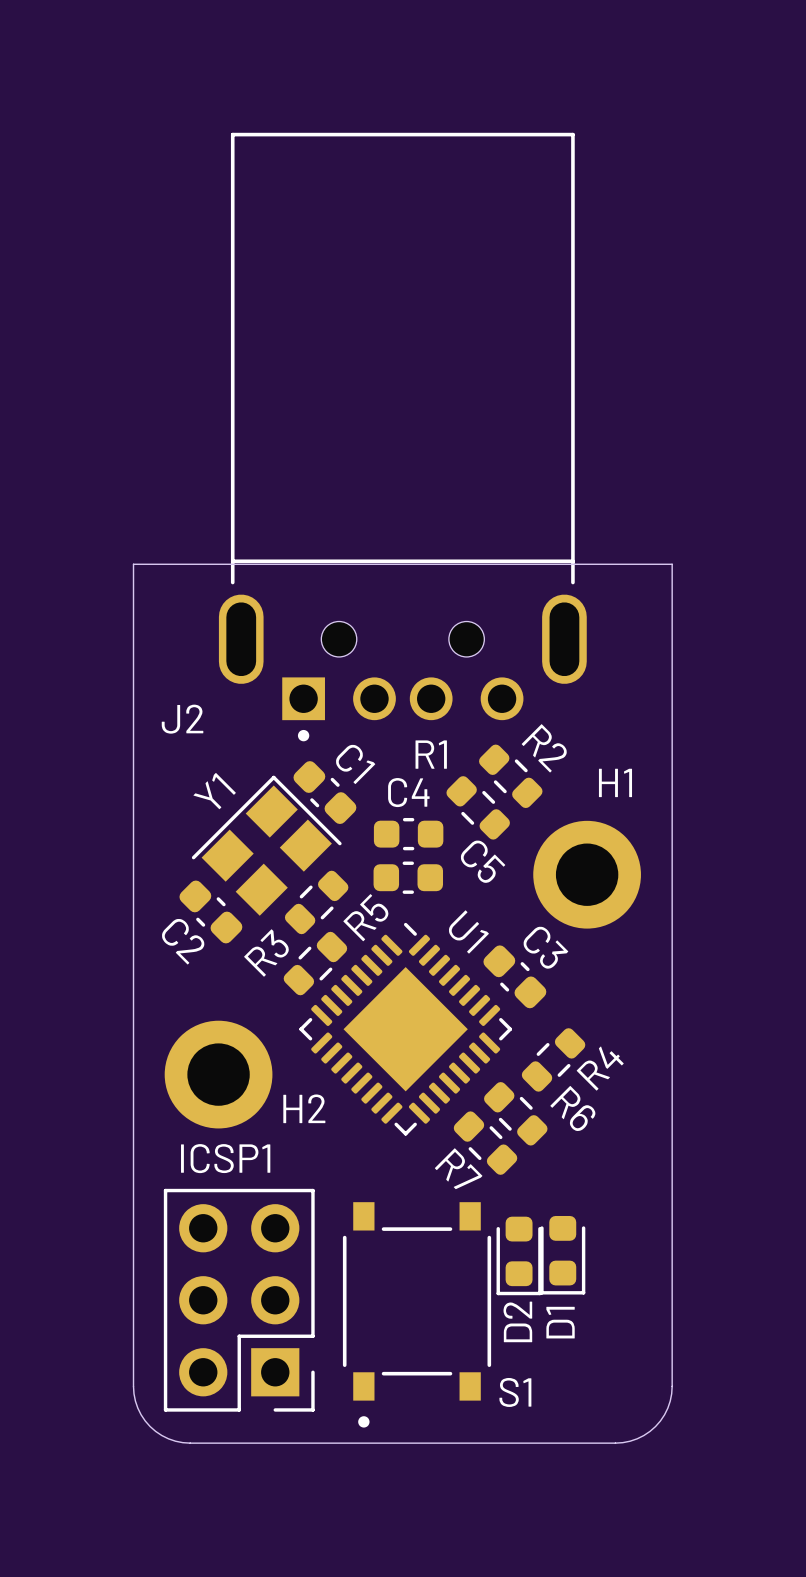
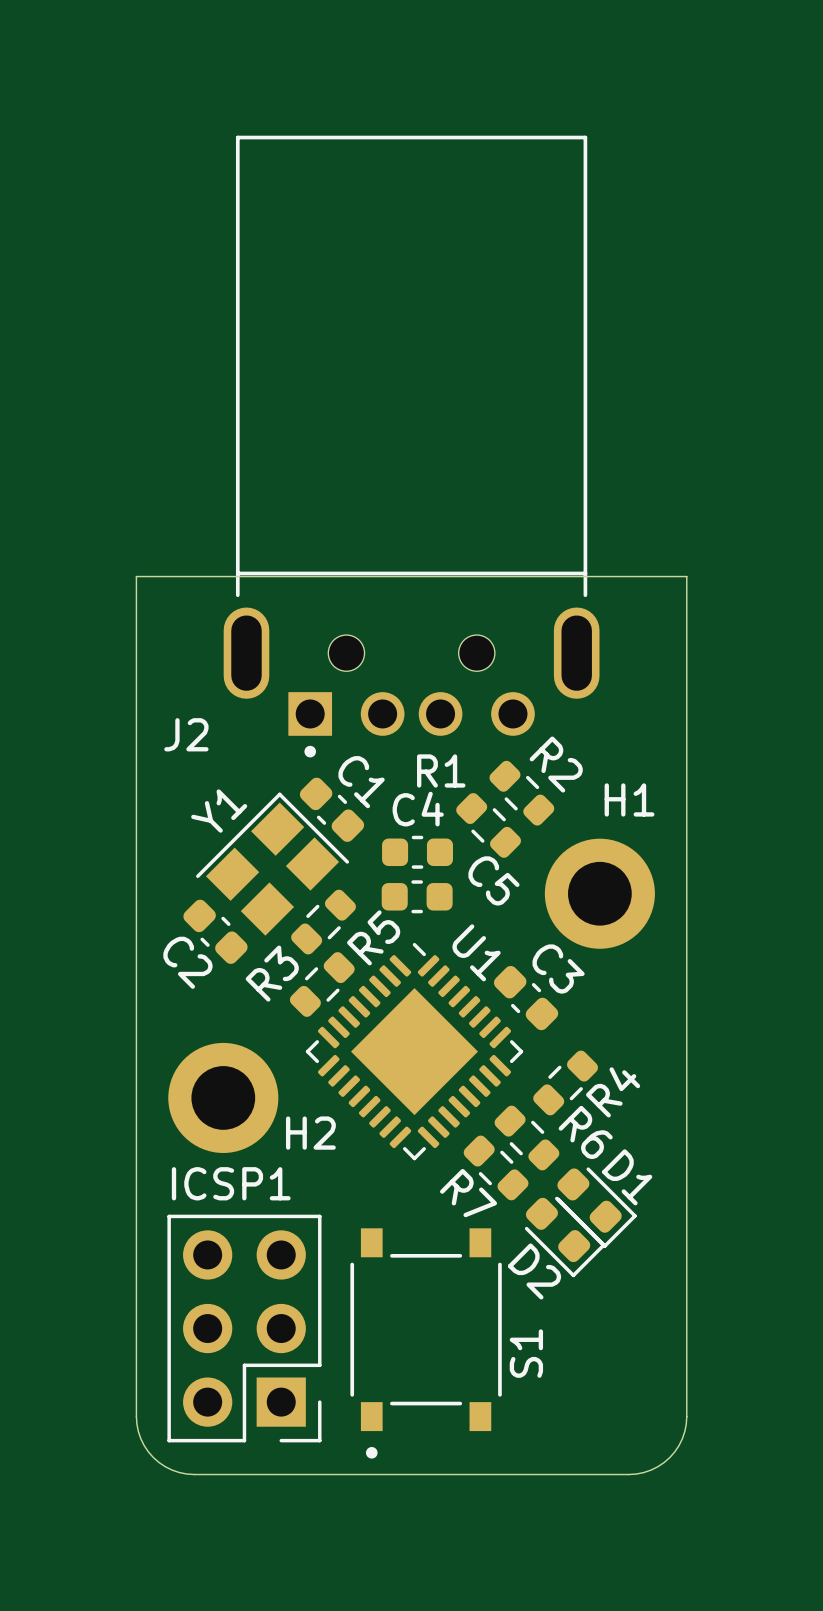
D2 rotation: 0° (519, 1255) -> 45° counterclockwise (565, 1236)
D2 position: (519, 1255) -> (565, 1236)
D1 rotation: 0° (562, 1255) -> 45° counterclockwise (596, 1207)
D1 position: (562, 1255) -> (596, 1207)
D1 name position: D1 (560, 1322) -> D1 (627, 1177)
S1 name rotation: 0° (515, 1392) -> 90° counterclockwise (526, 1353)
S1 name position: S1 (515, 1392) -> S1 (526, 1353)

